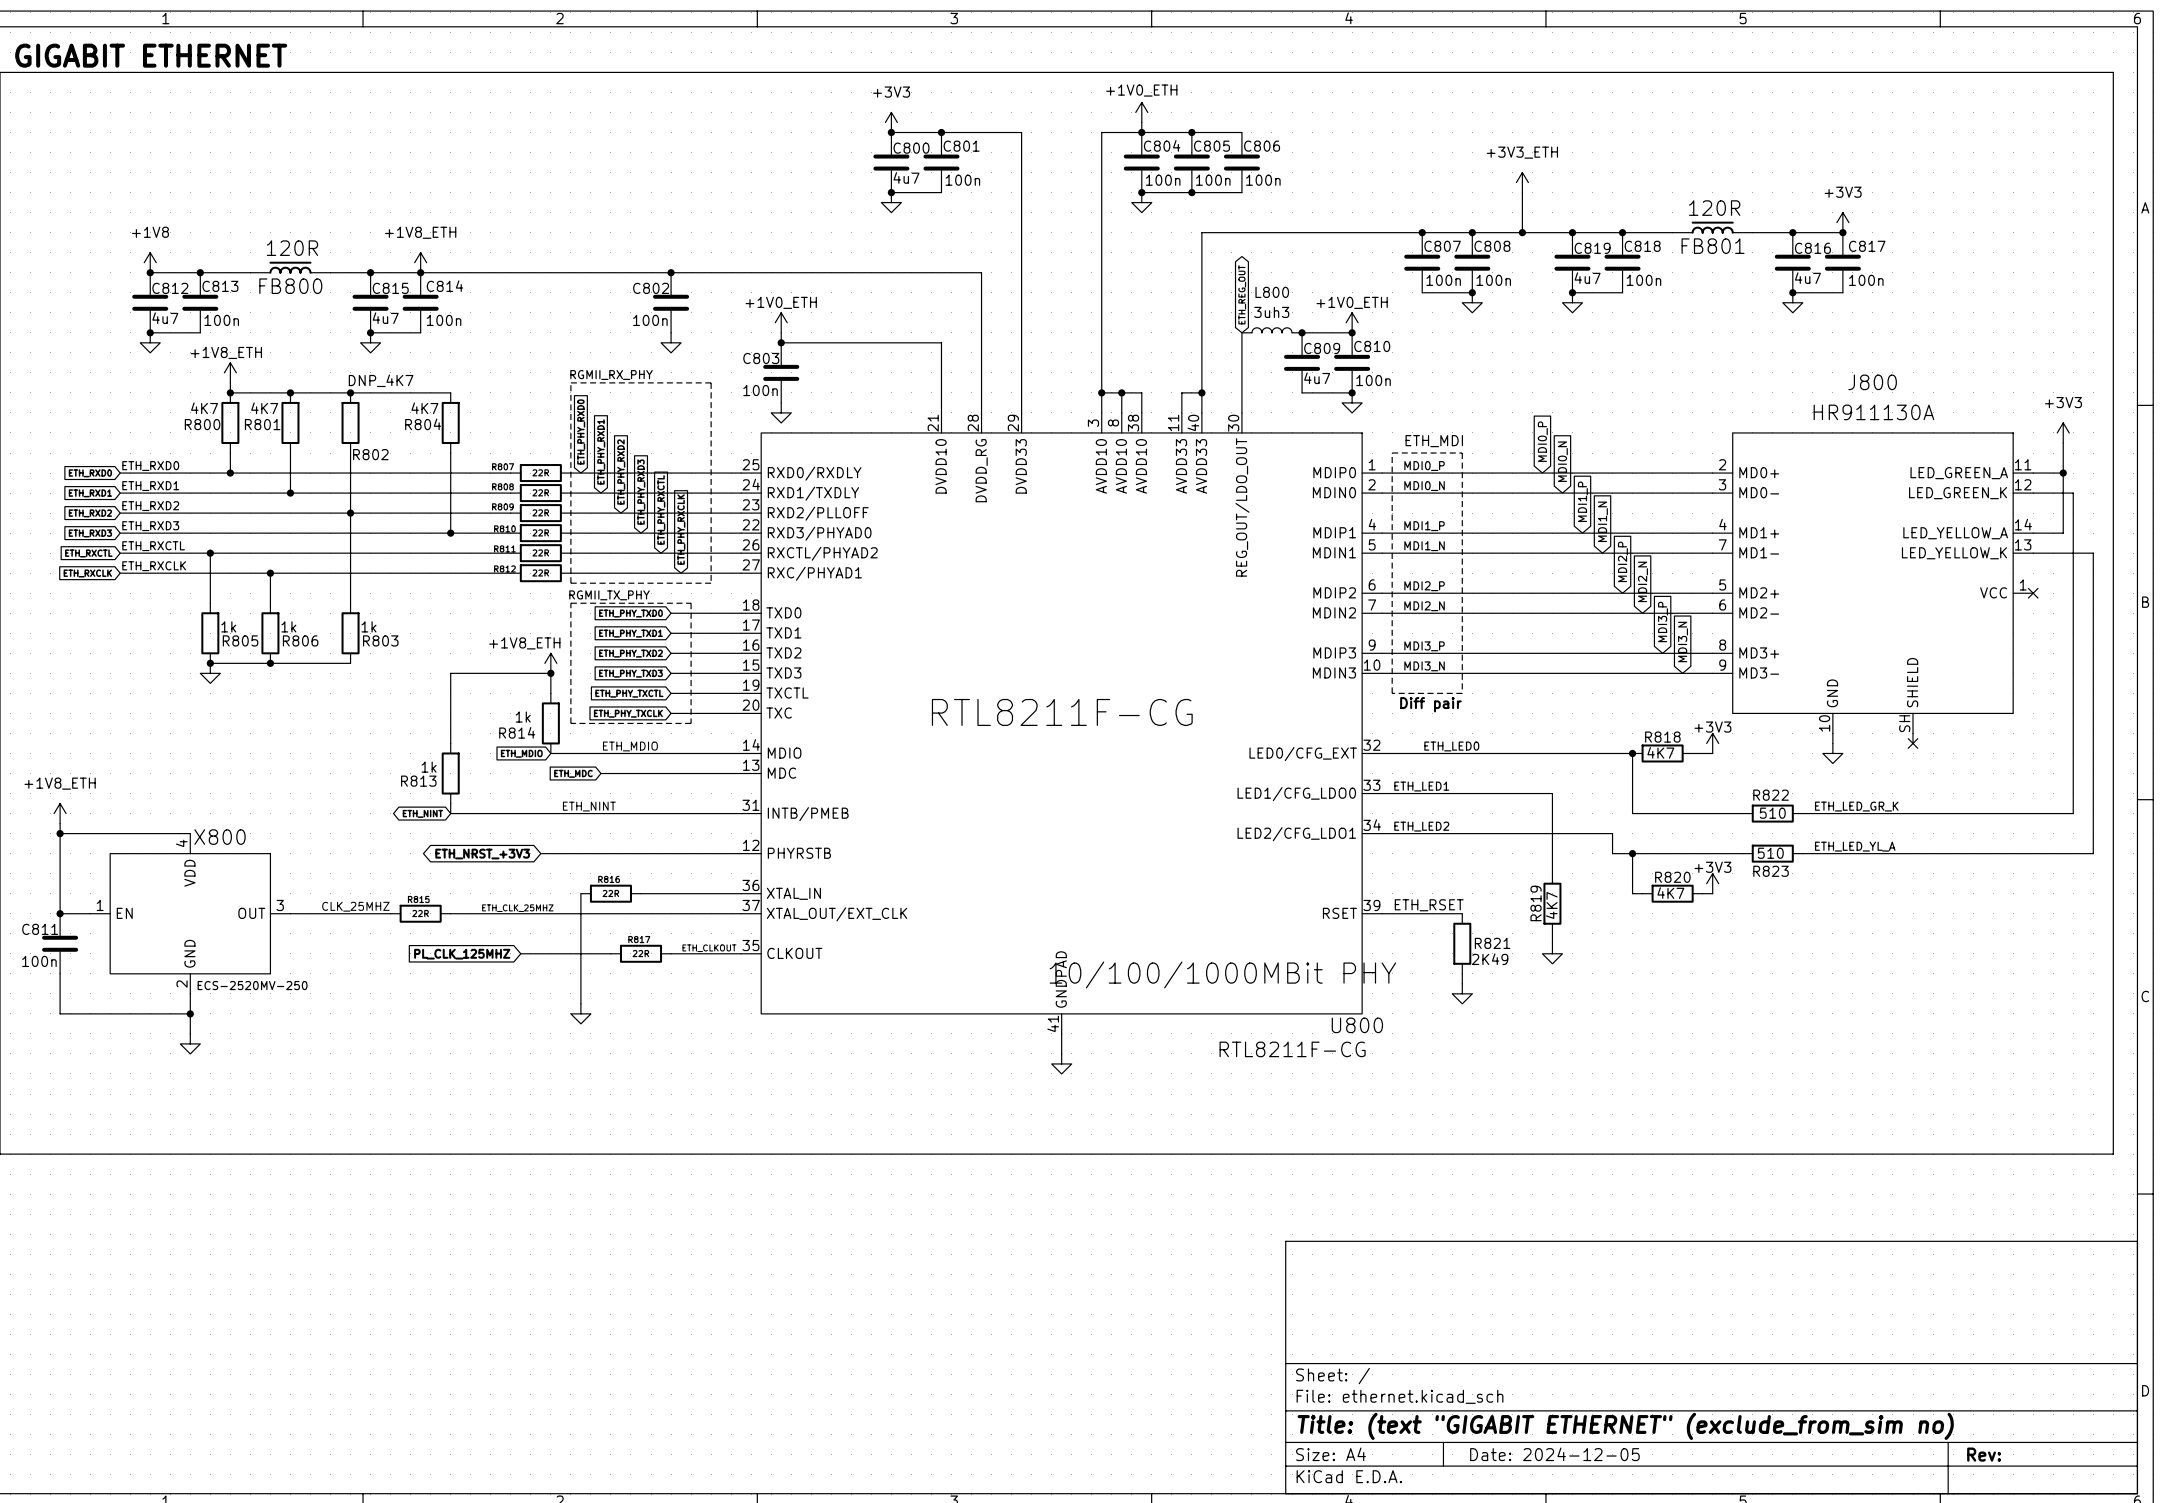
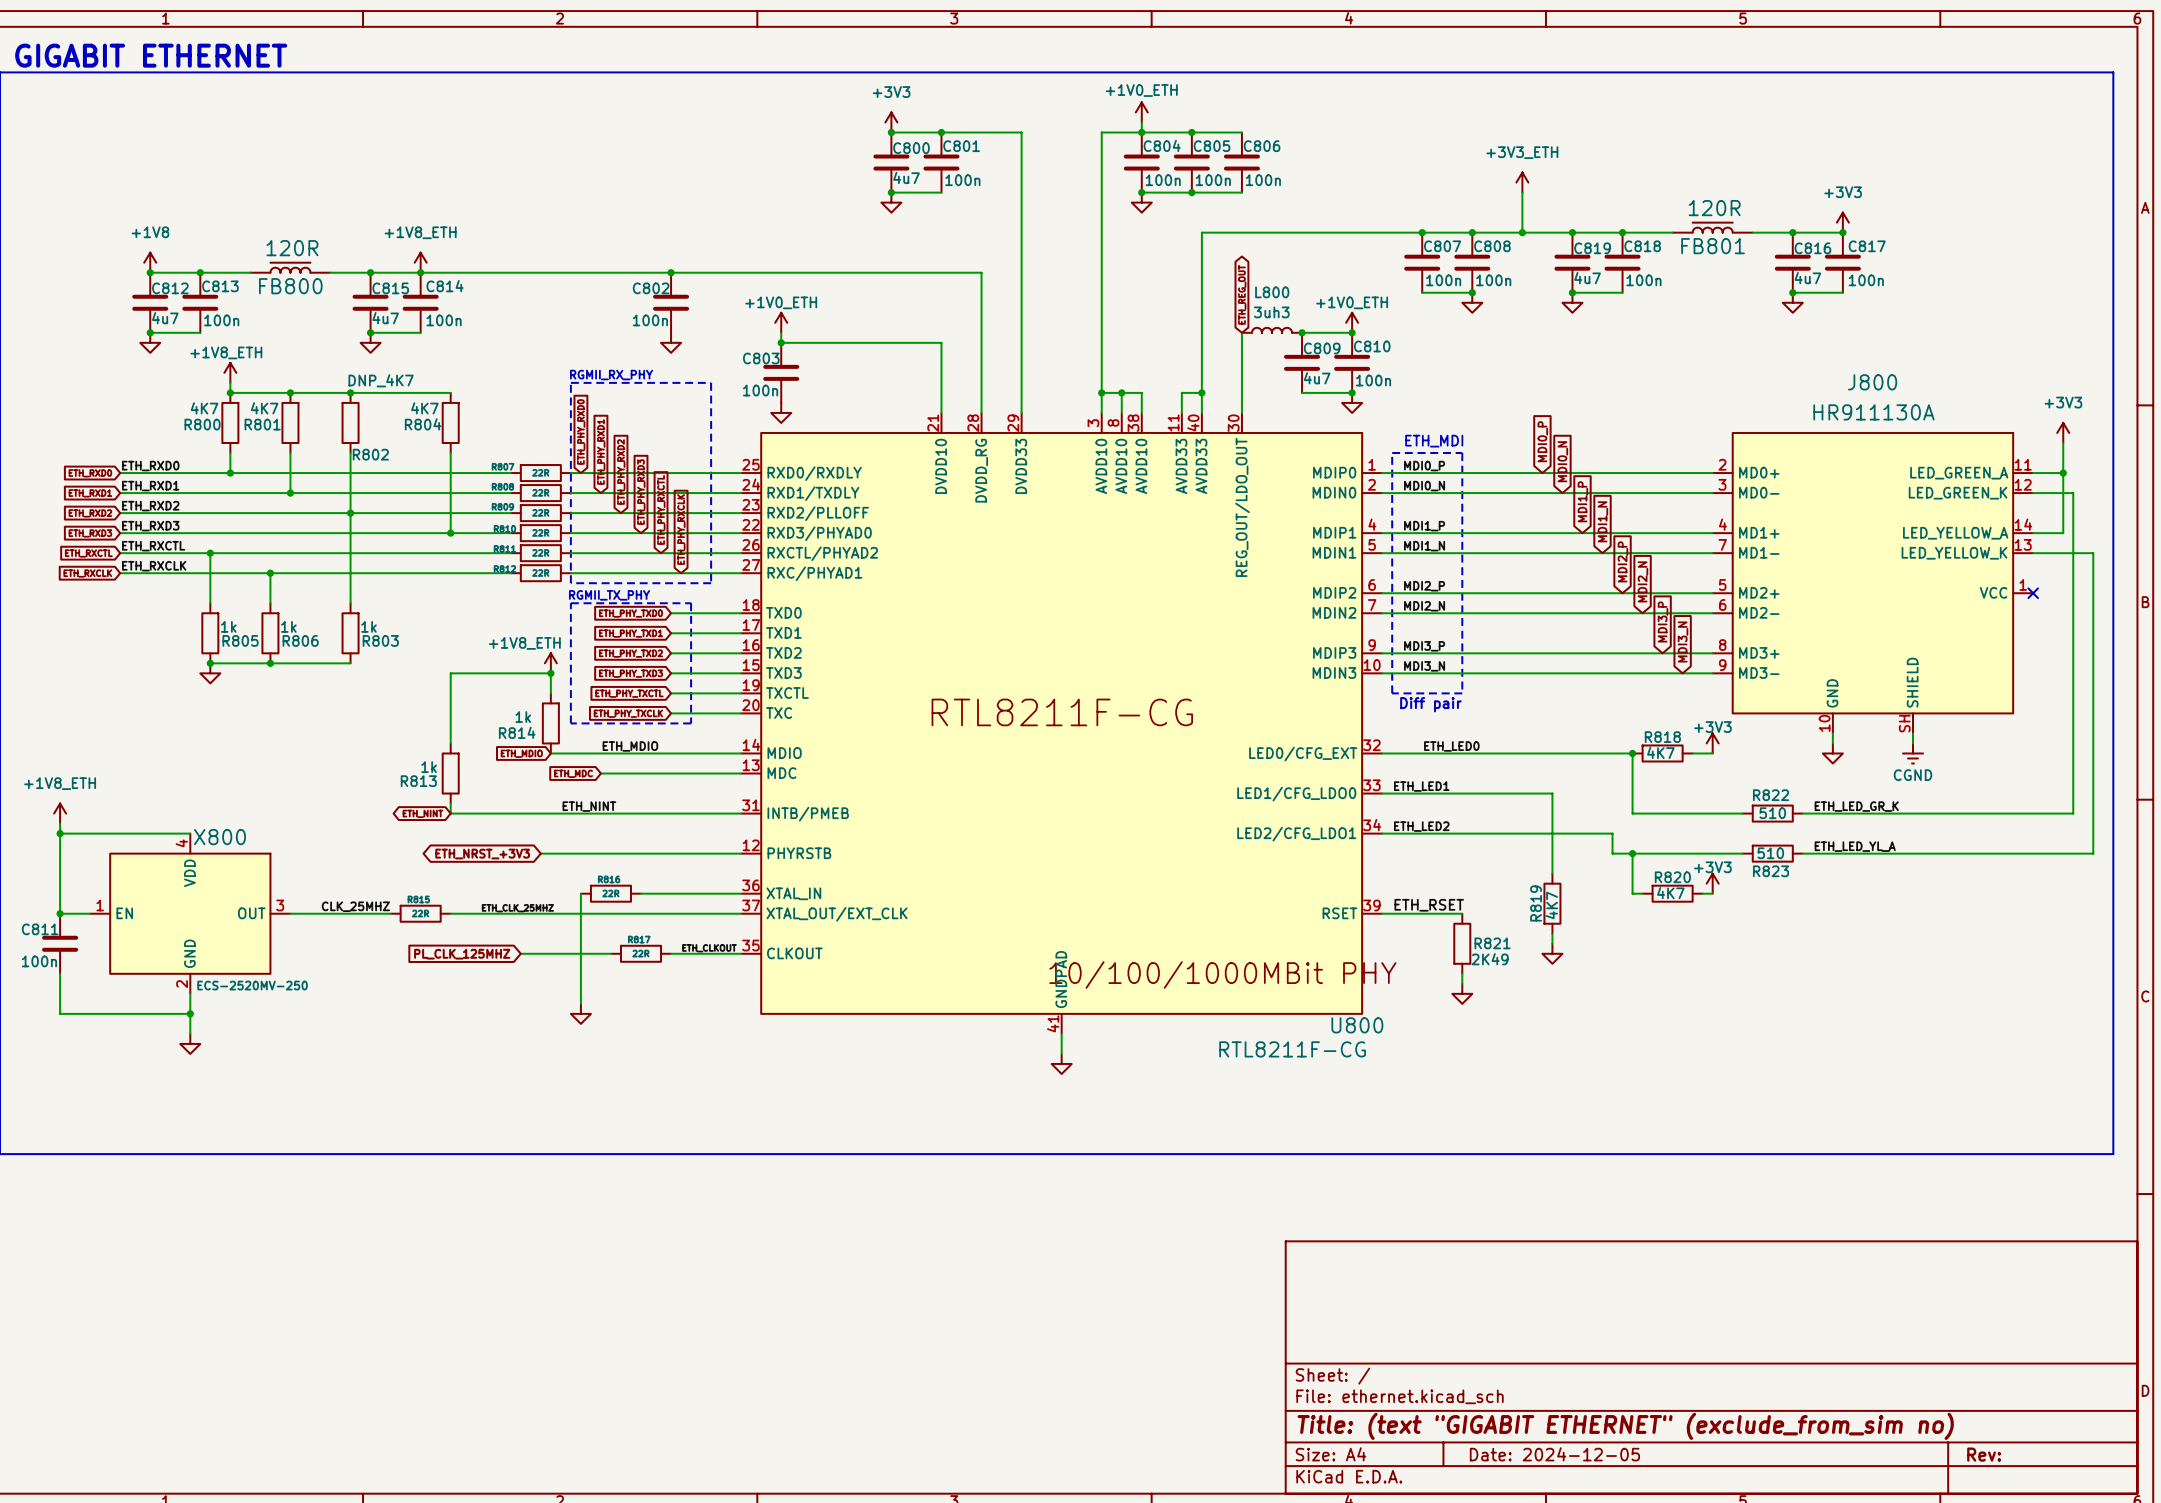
no-connect mark: (1913, 743) -> none
power symbol: none -> CGND (1913, 753)

